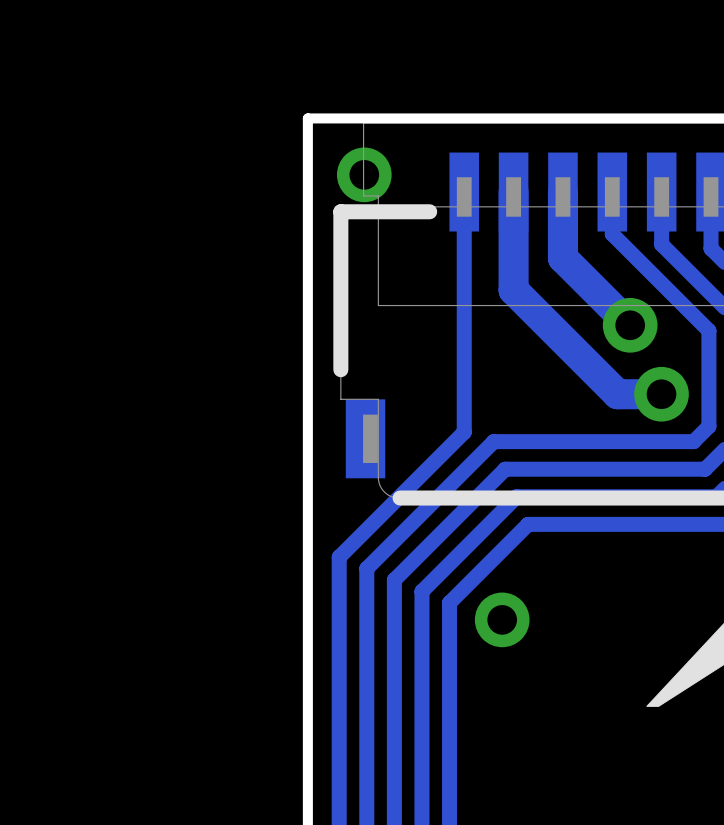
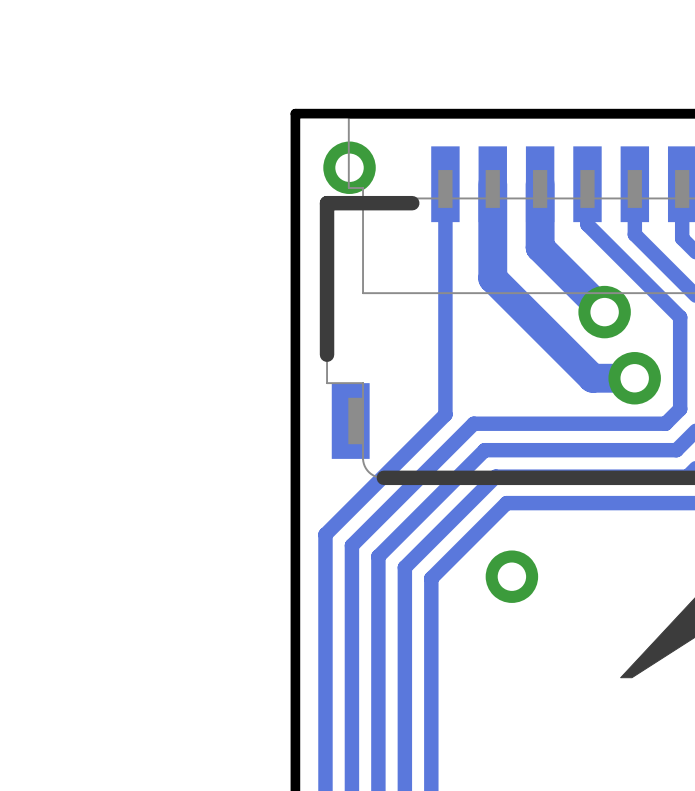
via position: (502, 619) -> (511, 576)

